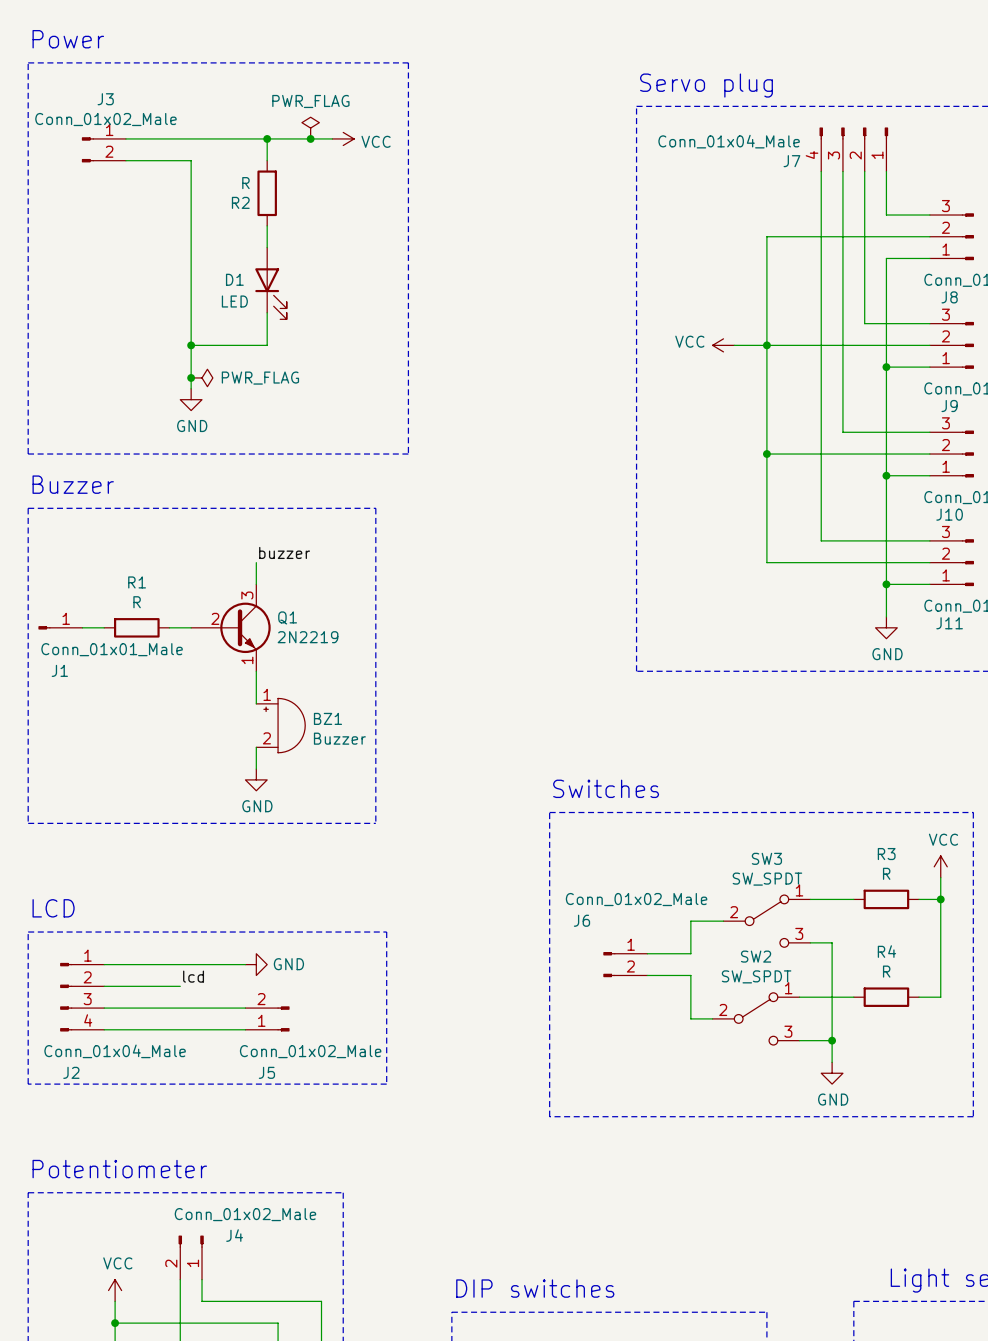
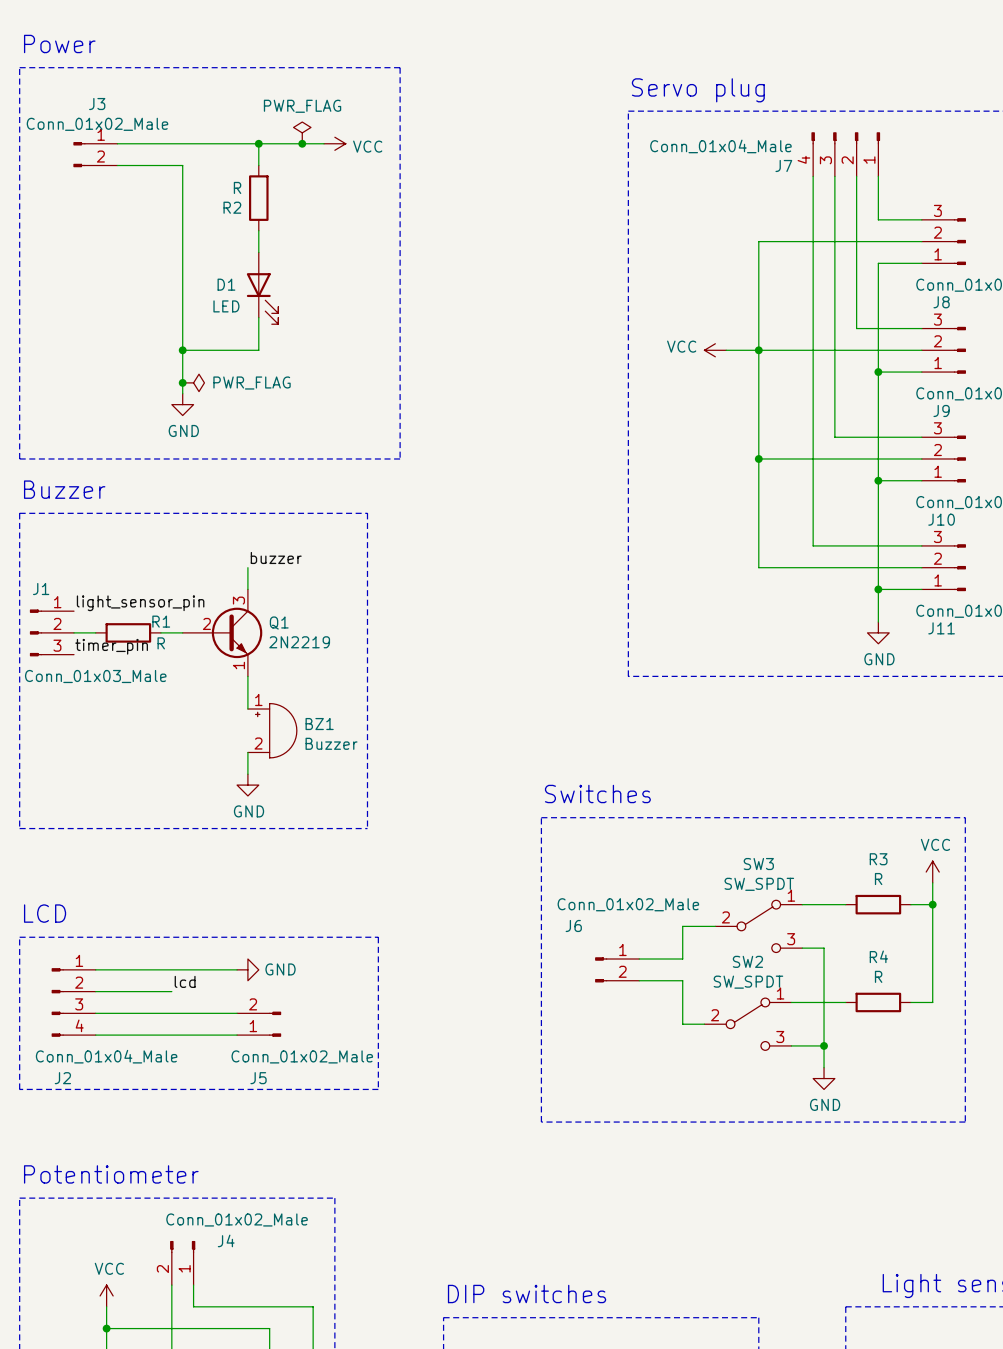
R1 name position: R1 (137, 582) -> R1 (161, 621)
label: none -> light_sensor_pin (140, 603)
R1 value position: R (137, 602) -> R (161, 643)
J1 symbol: [38, 626, 83, 630] -> [29, 609, 75, 657]
label: none -> timer_pin (111, 646)
J1 value: Conn_01x01_Male (112, 649) -> Conn_01x03_Male (95, 676)
J1 name position: J1 (59, 670) -> J1 (41, 589)

